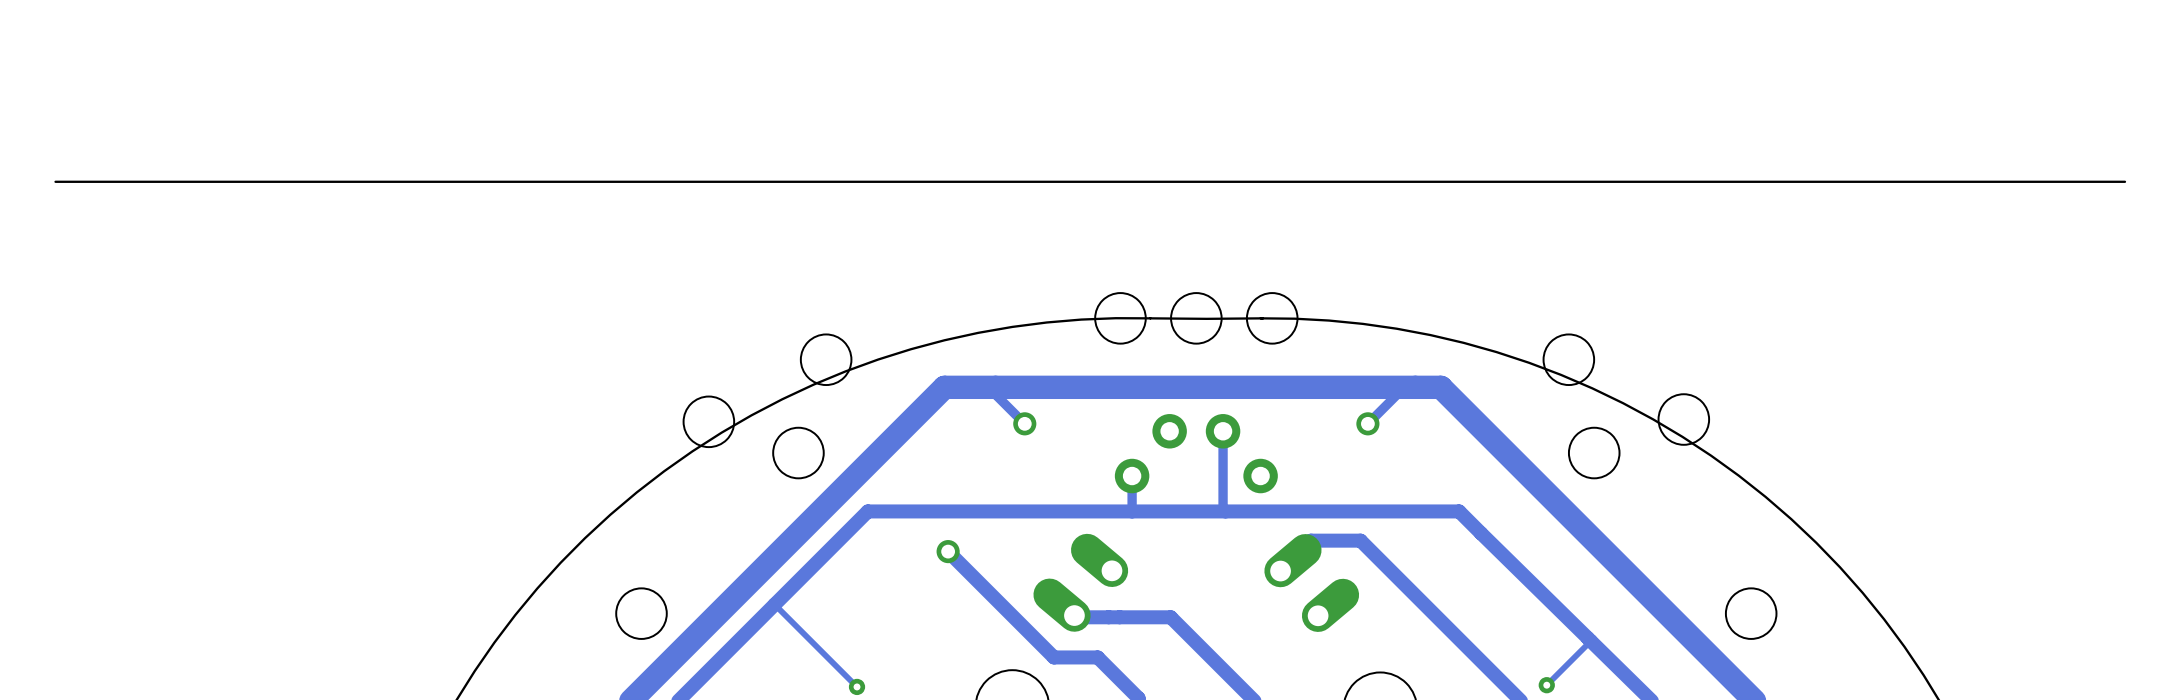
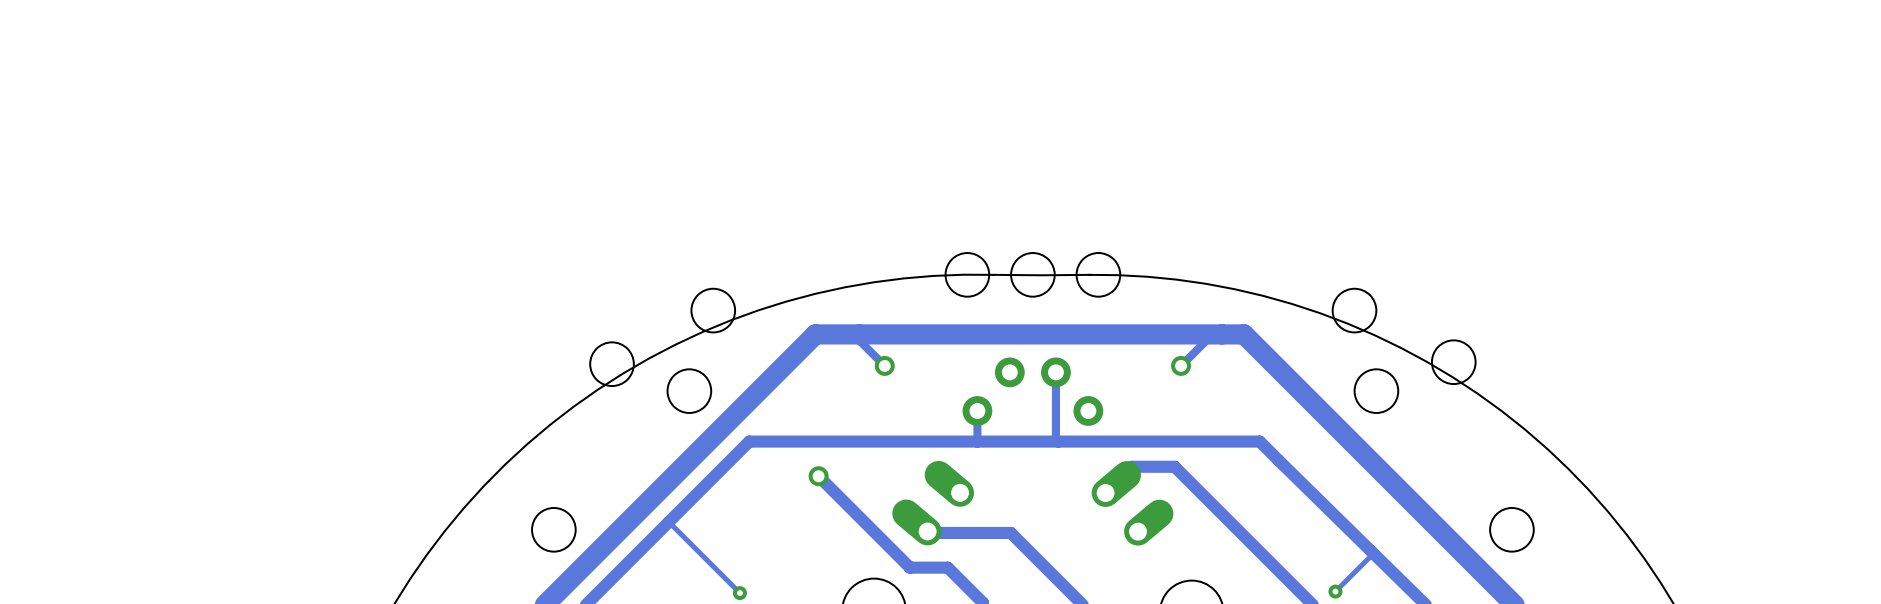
board edge: (2124, 181) (55, 181) -> none

